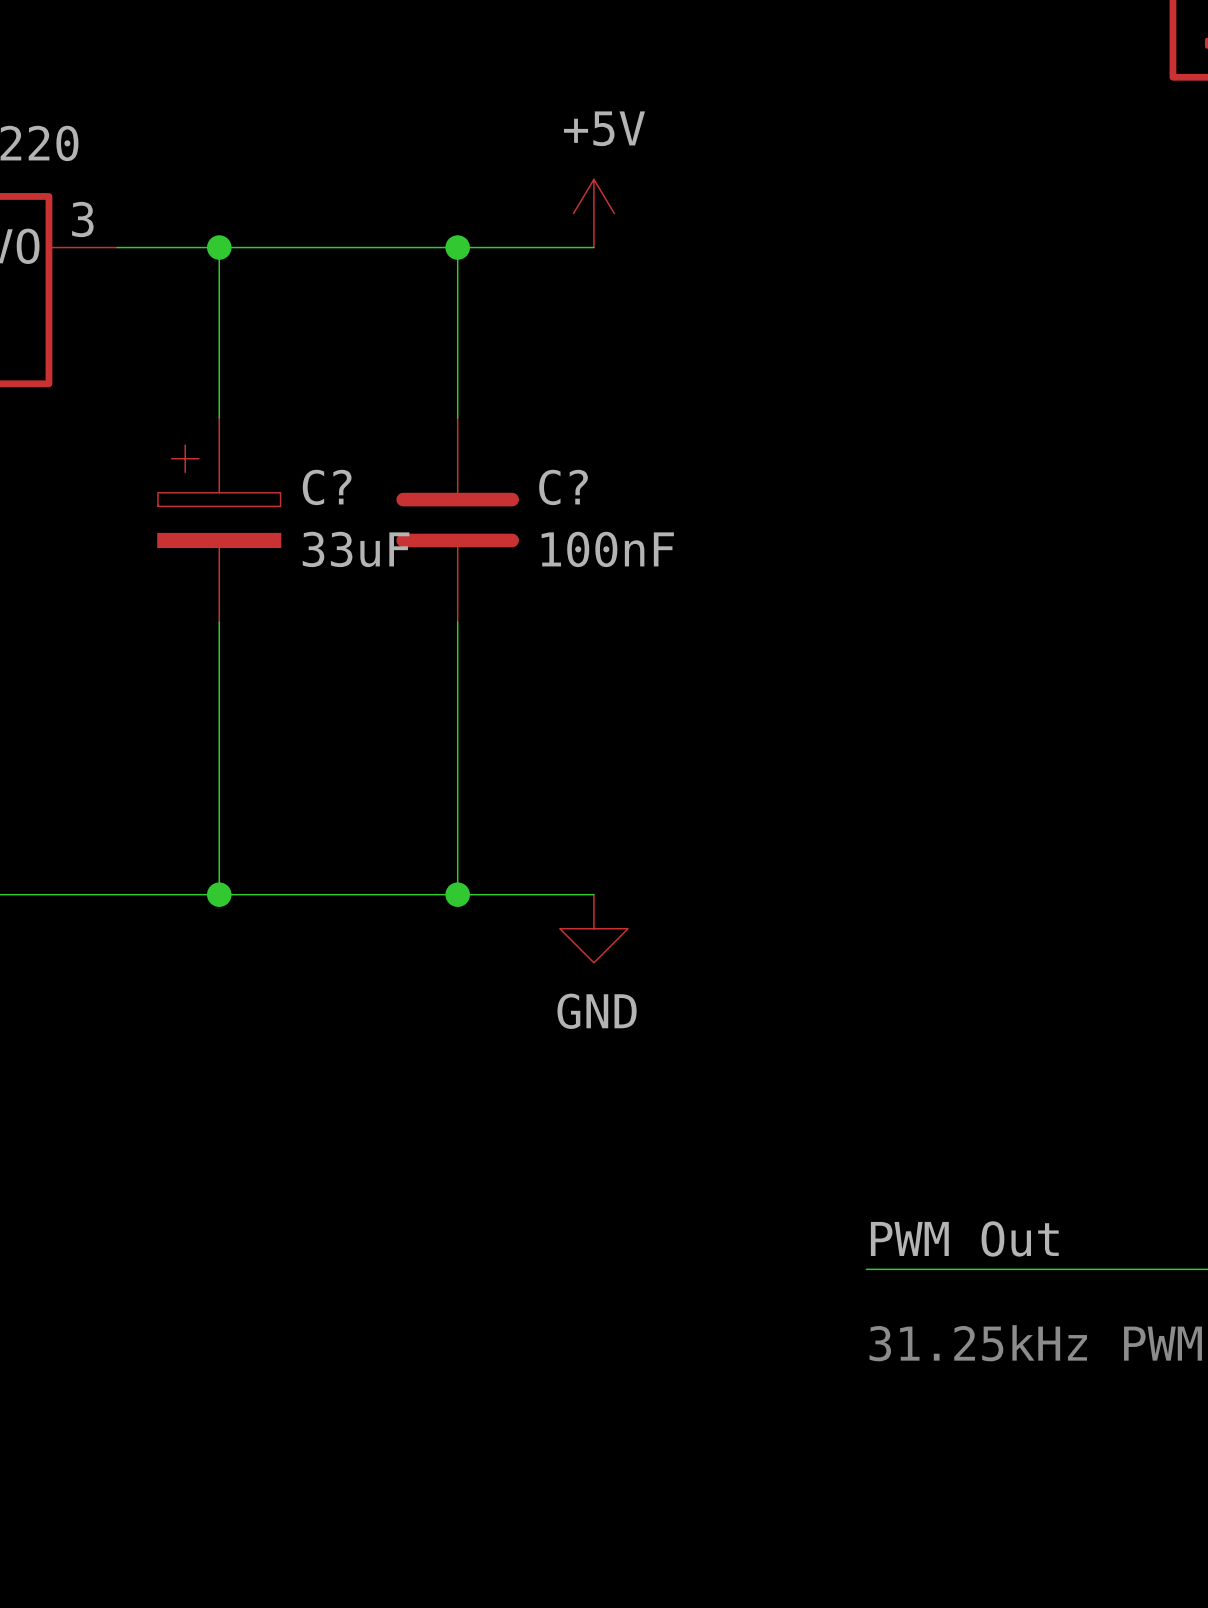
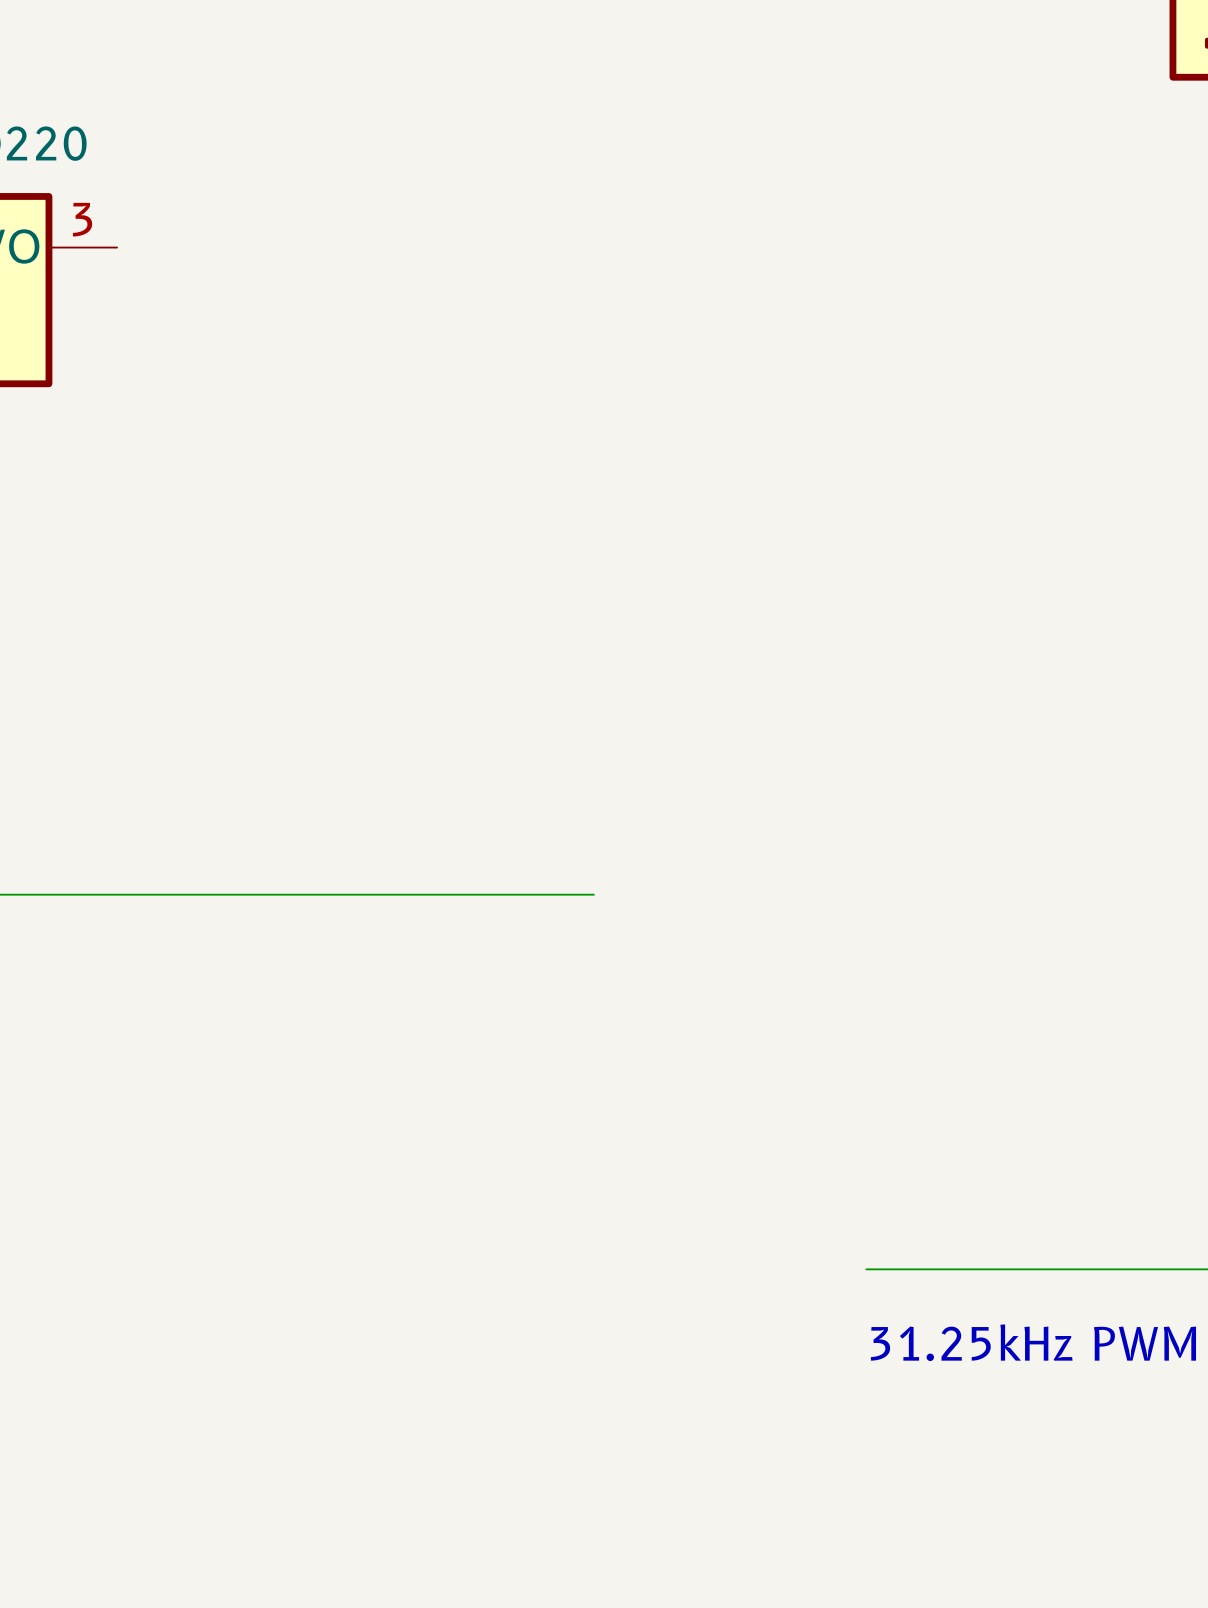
power symbol: +5V (593, 213) -> none
wire: (117, 247) (593, 247) -> none
wire: (219, 247) (219, 417) -> none
junction: (219, 247) -> none
wire: (457, 247) (457, 417) -> none
junction: (457, 247) -> none
C?: 33uF (219, 520) -> none
C?: 100nF (457, 520) -> none
wire: (219, 622) (219, 894) -> none
wire: (457, 622) (457, 894) -> none
junction: (219, 894) -> none
junction: (457, 894) -> none
power symbol: GND (593, 928) -> none
label: PWM Out (964, 1238) -> none

